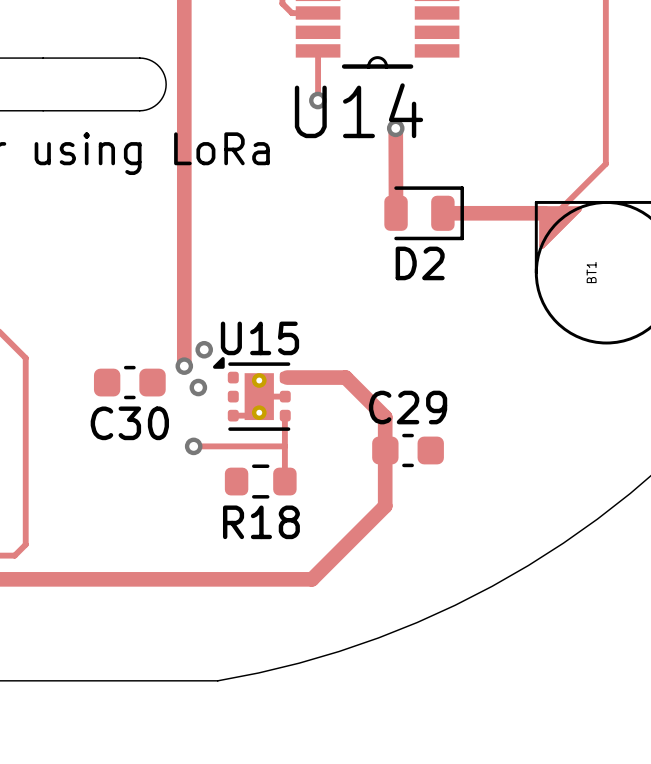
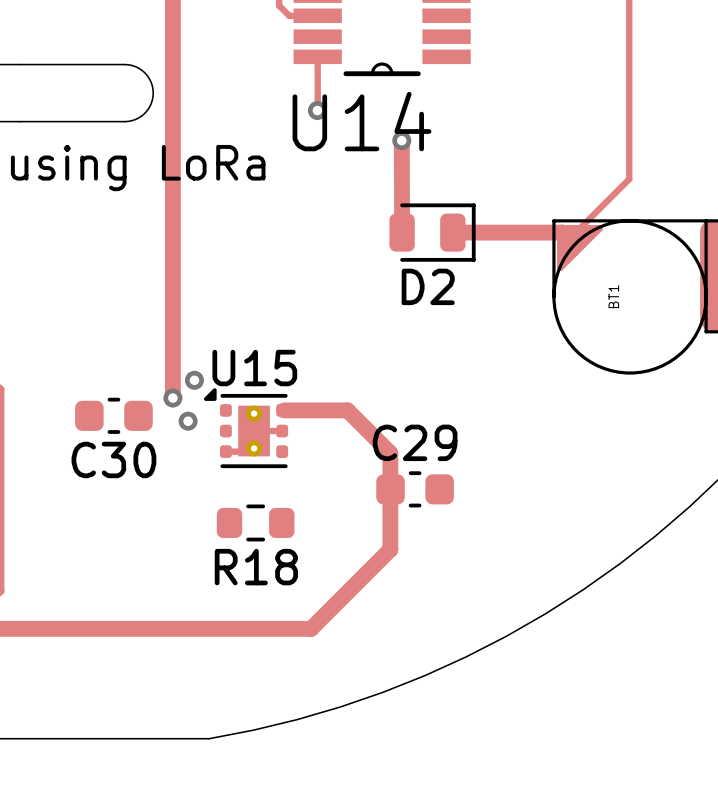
track: (284, 416) (284, 481) -> none
track: (193, 446) (284, 446) -> none
via: (193, 446) -> none

